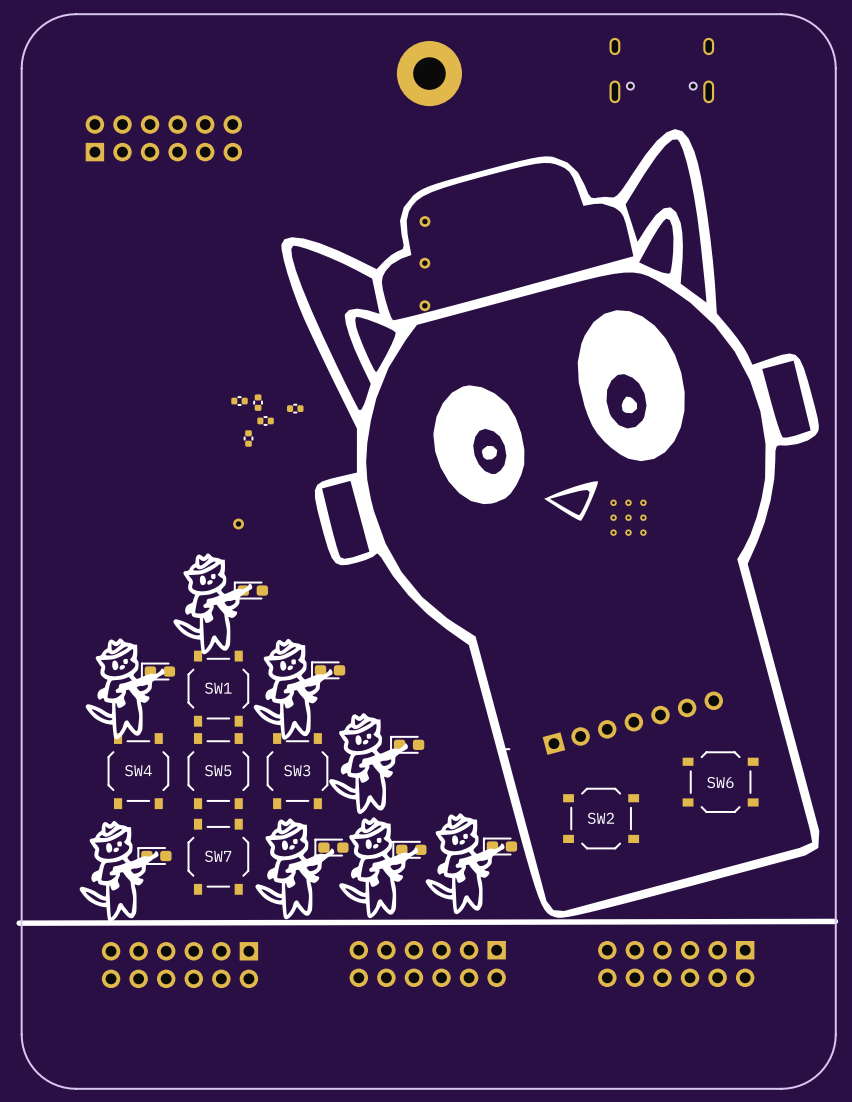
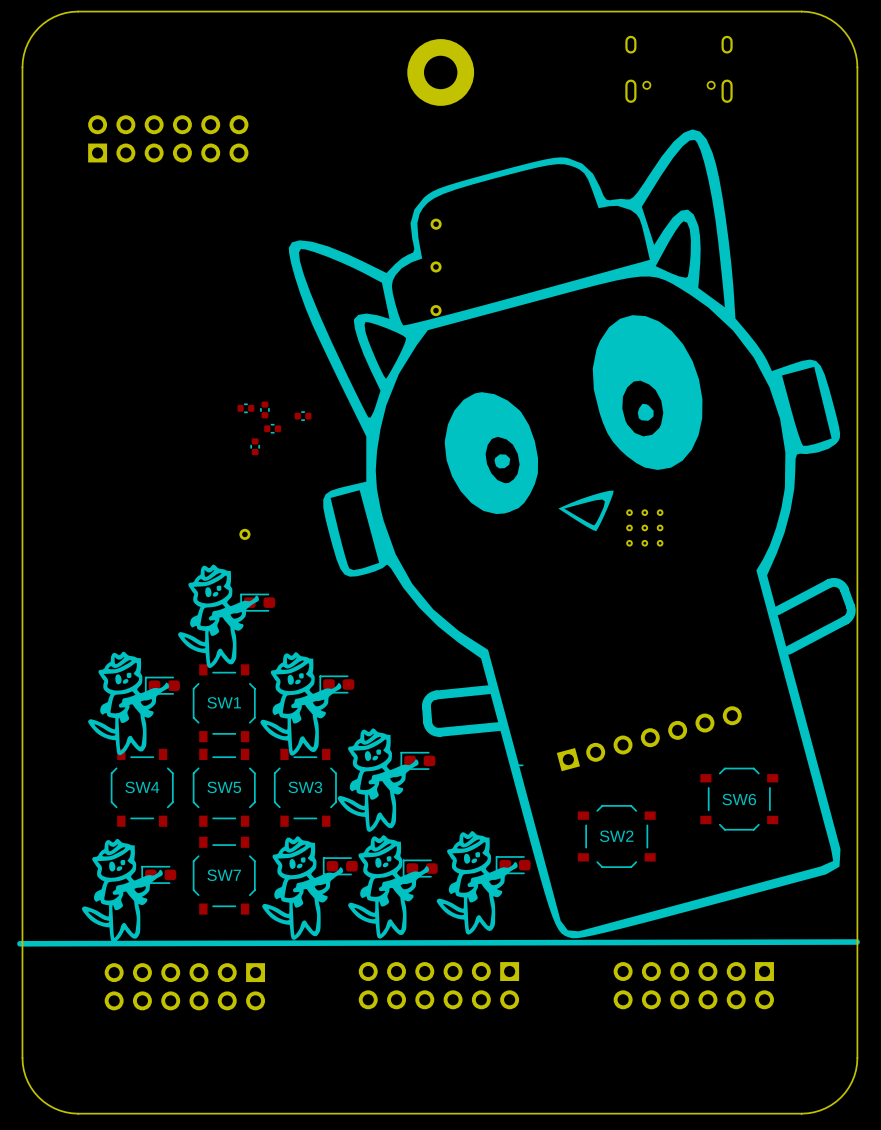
line: none -> (777, 610) (834, 582) (843, 587) (850, 607) (850, 614) (846, 619) (788, 650)
line: none -> (493, 689) (432, 696) (426, 704) (428, 724) (431, 729) (438, 732) (502, 726)

